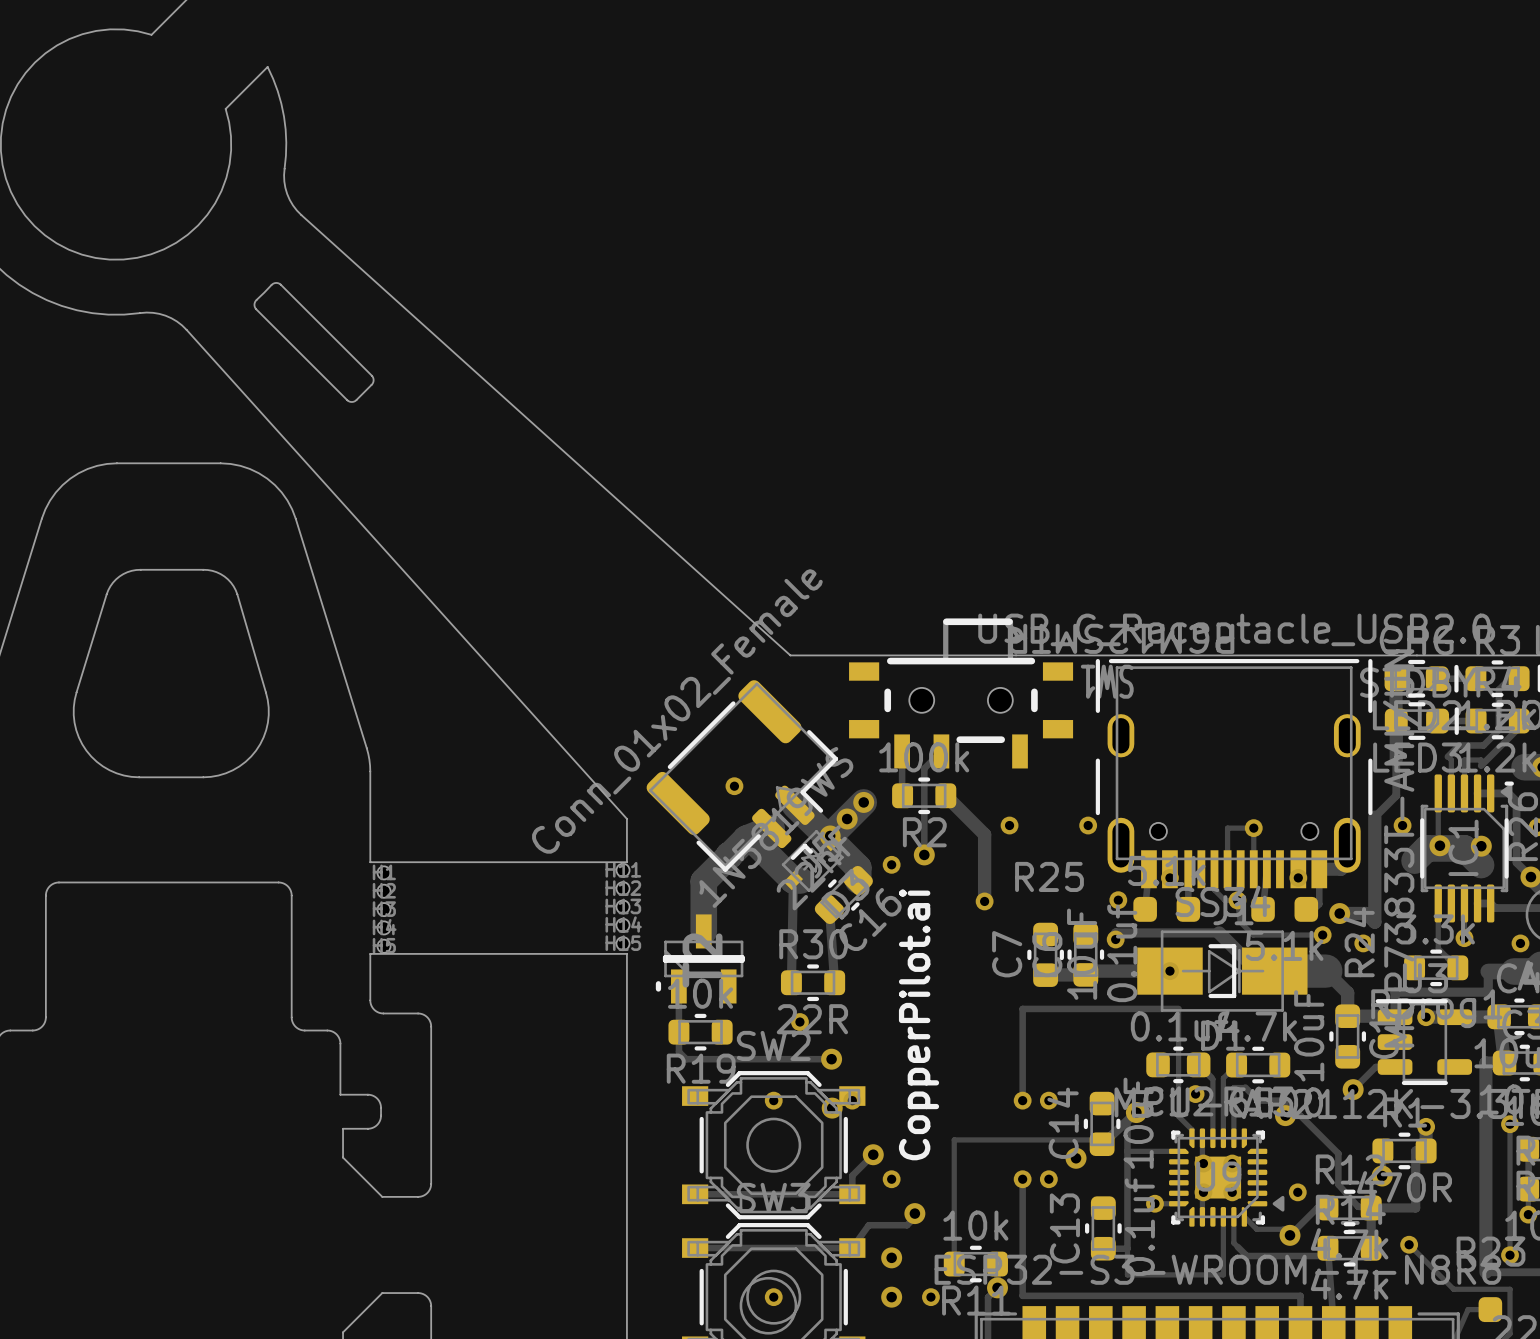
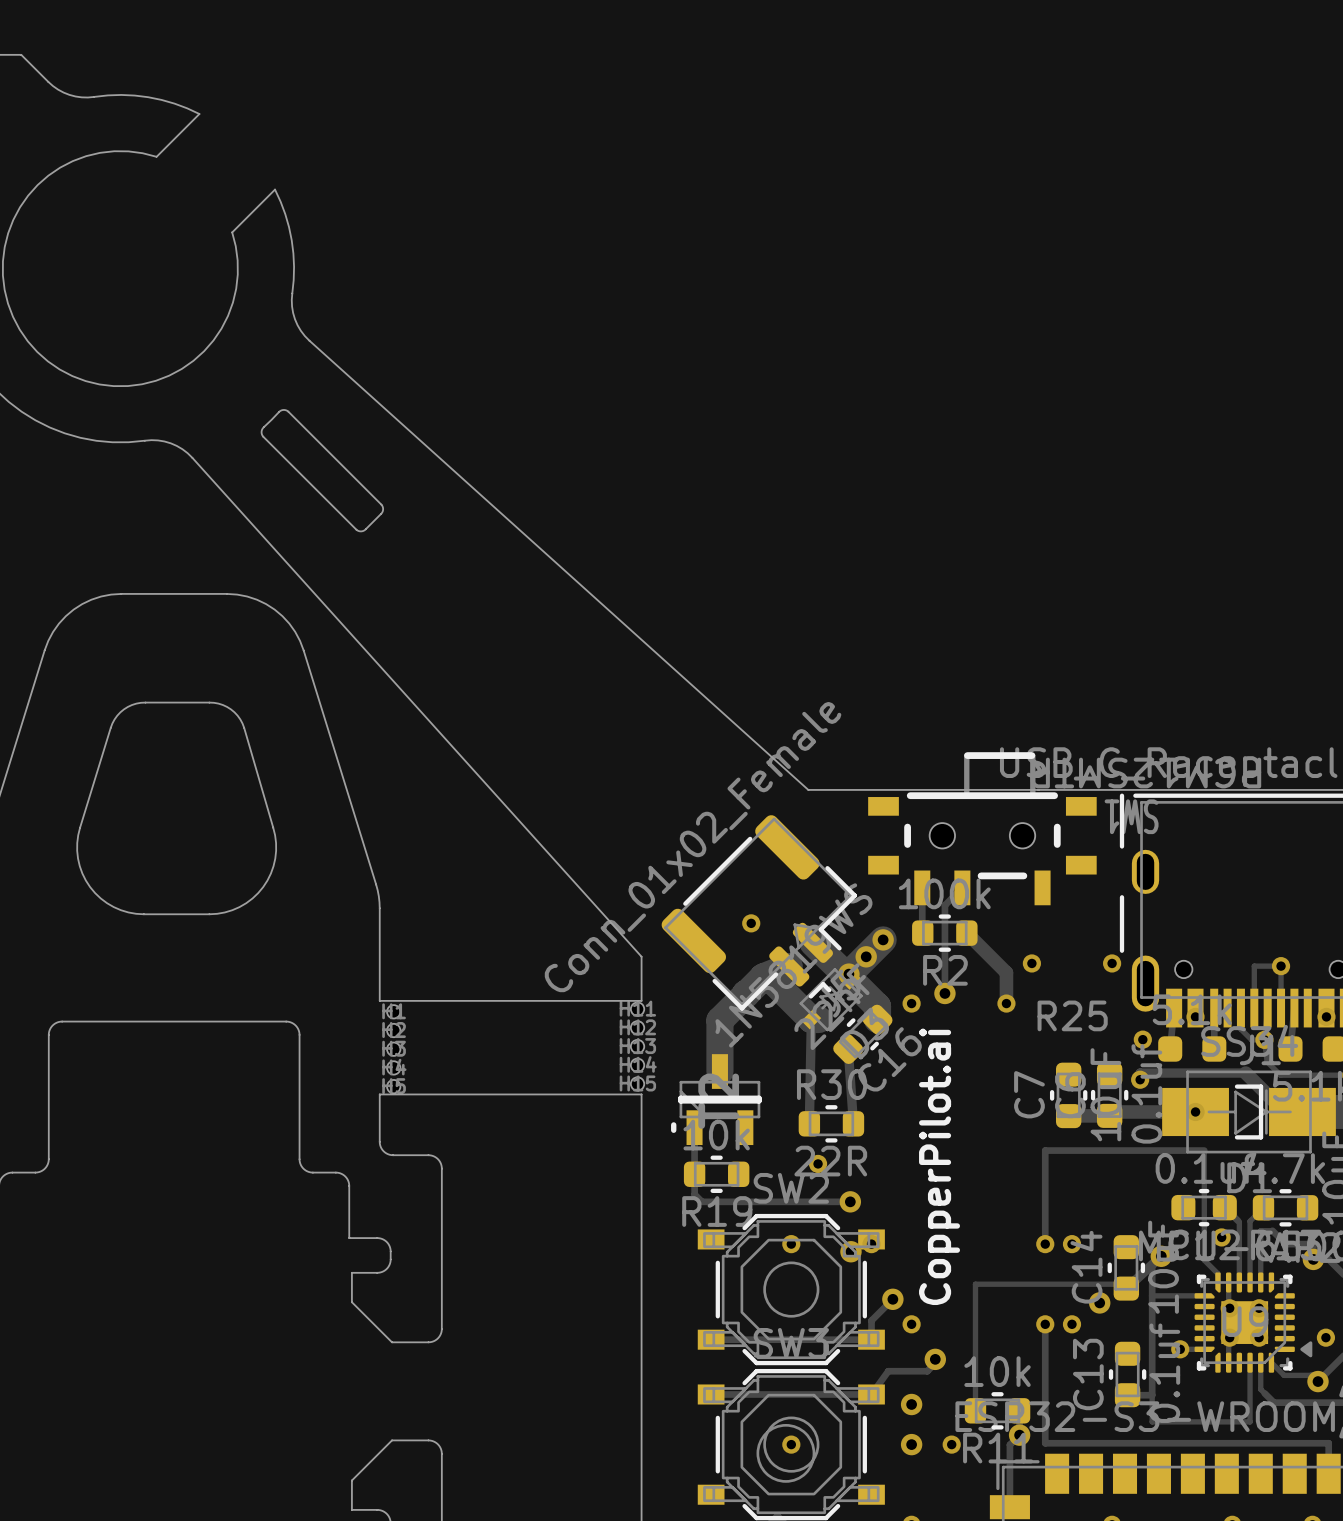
track: (984, 864) (984, 901) -> none
via position: (984, 901) -> (1006, 1003)

